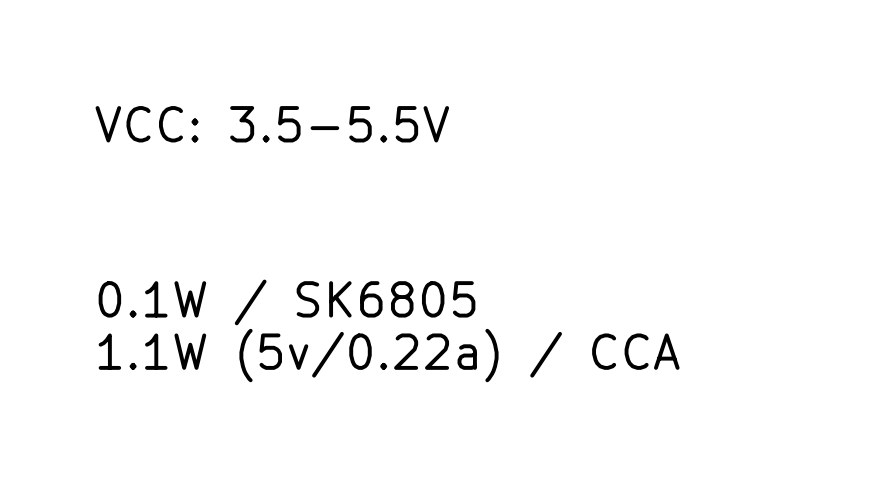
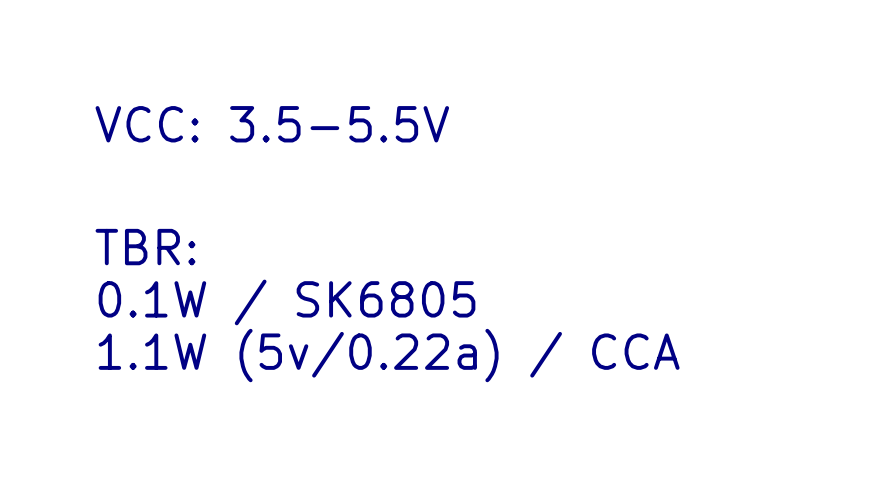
text: none -> TBR: (145, 247)

